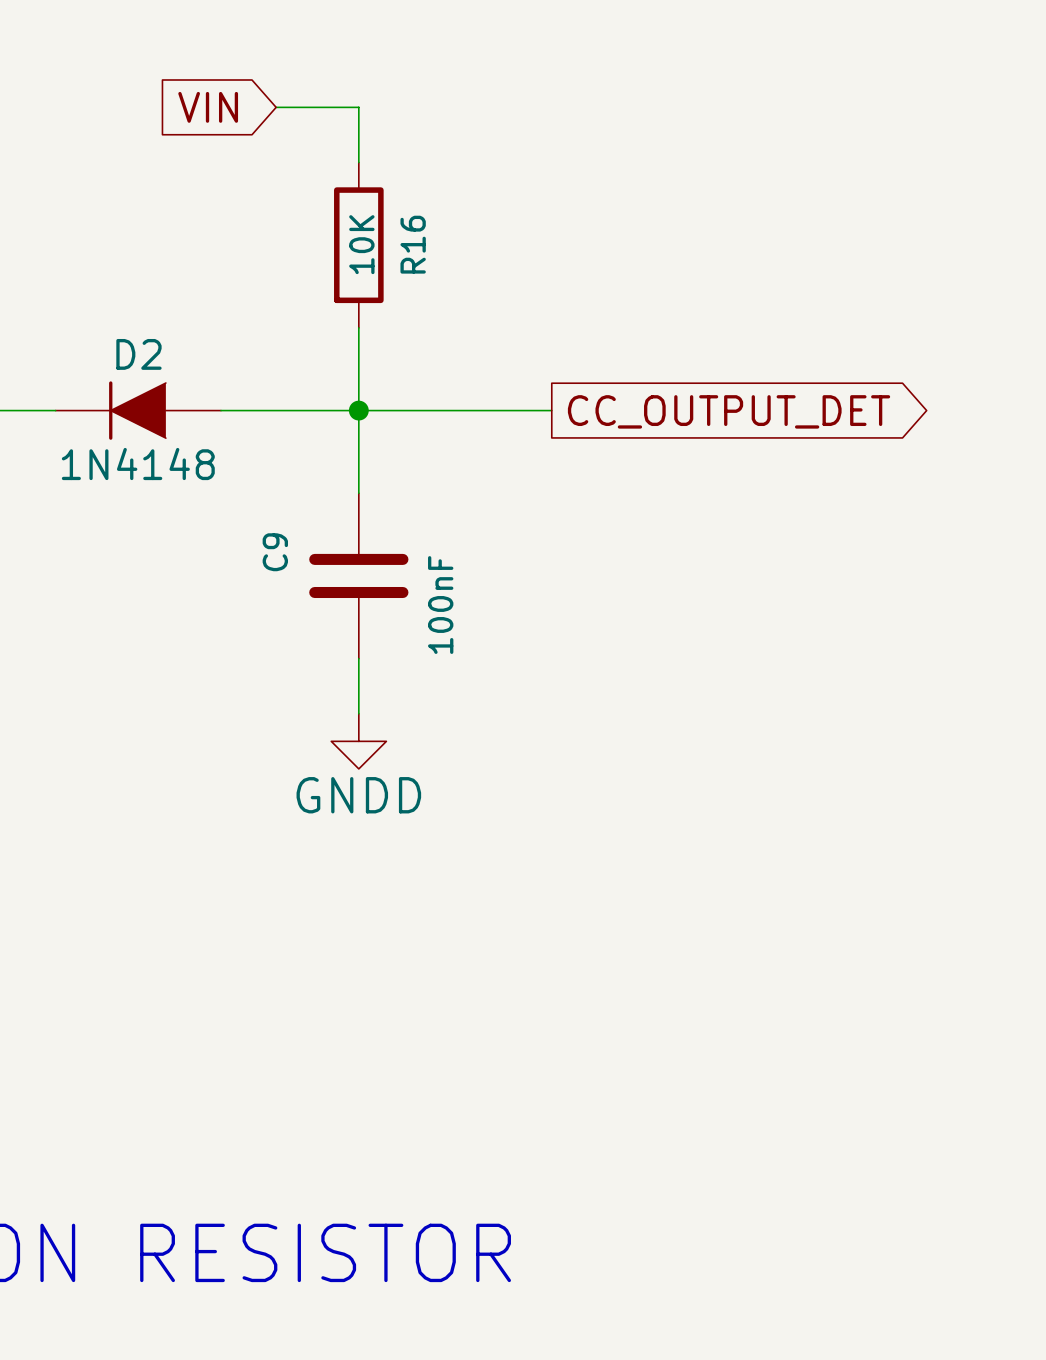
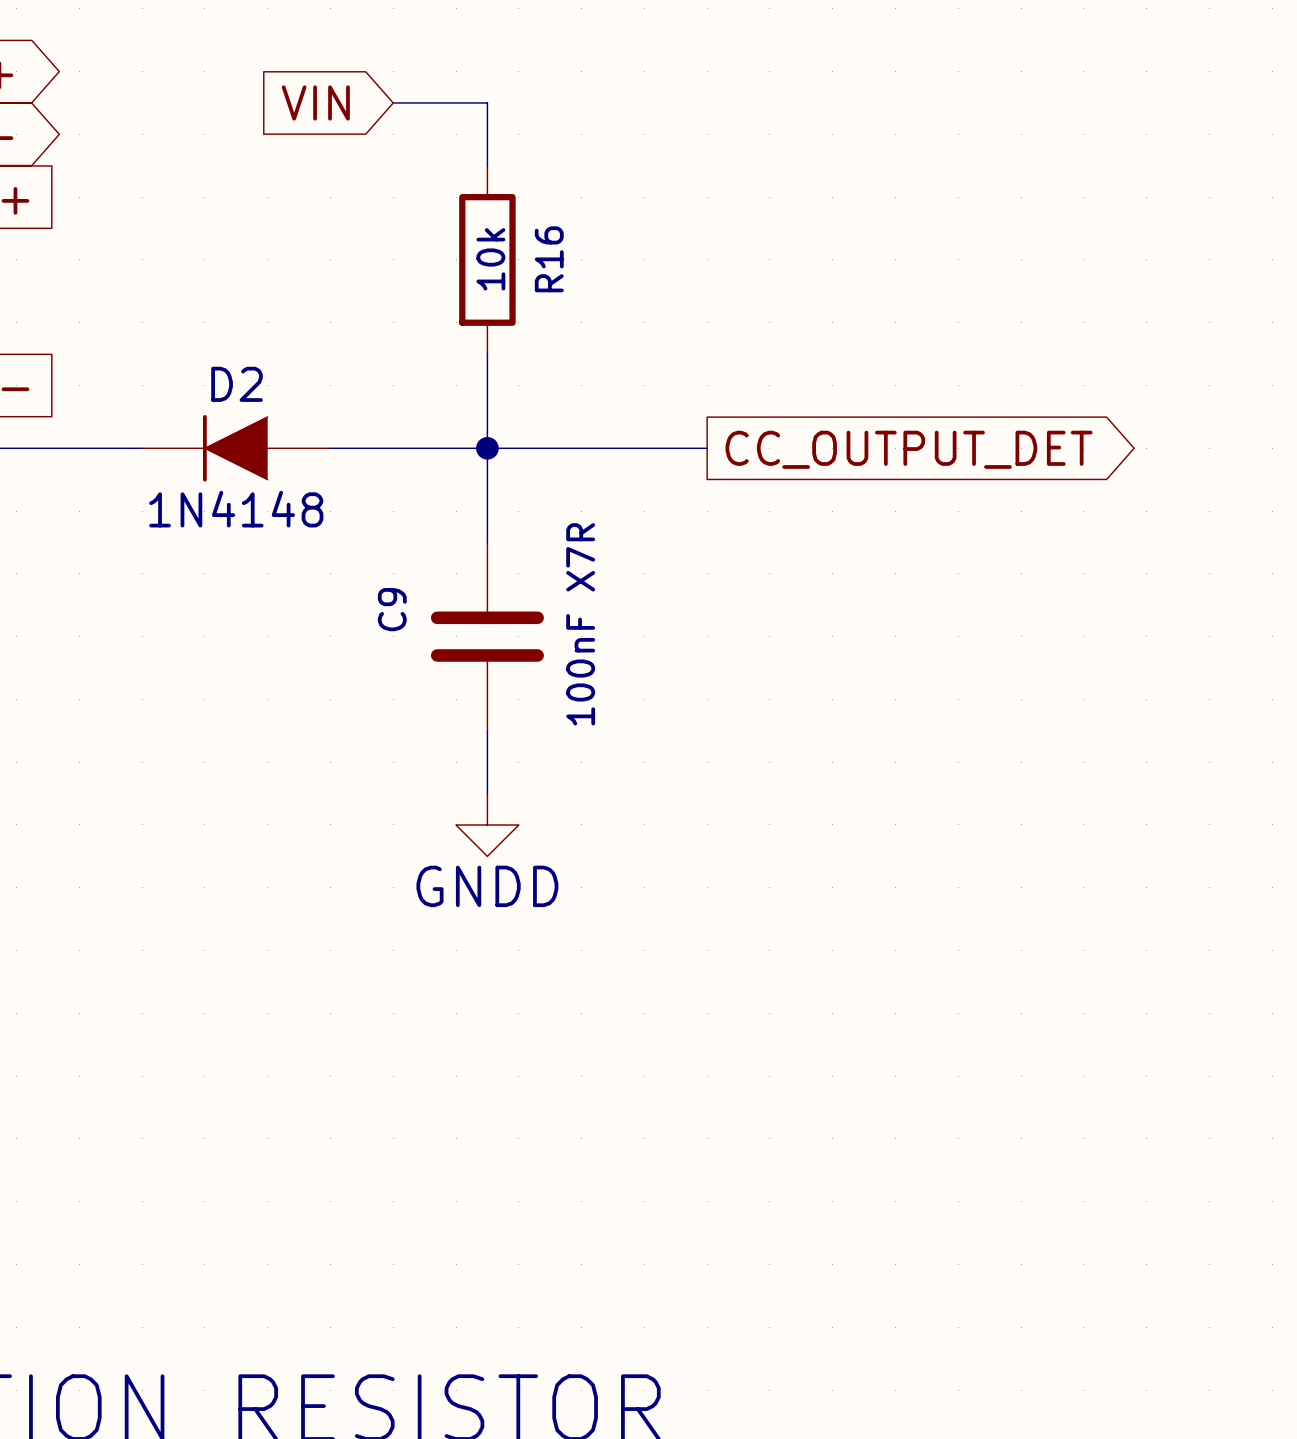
R16 value: 10K (361, 244) -> 10k (490, 259)
C9 value: 100nF (440, 605) -> 100nF X7R (580, 624)

